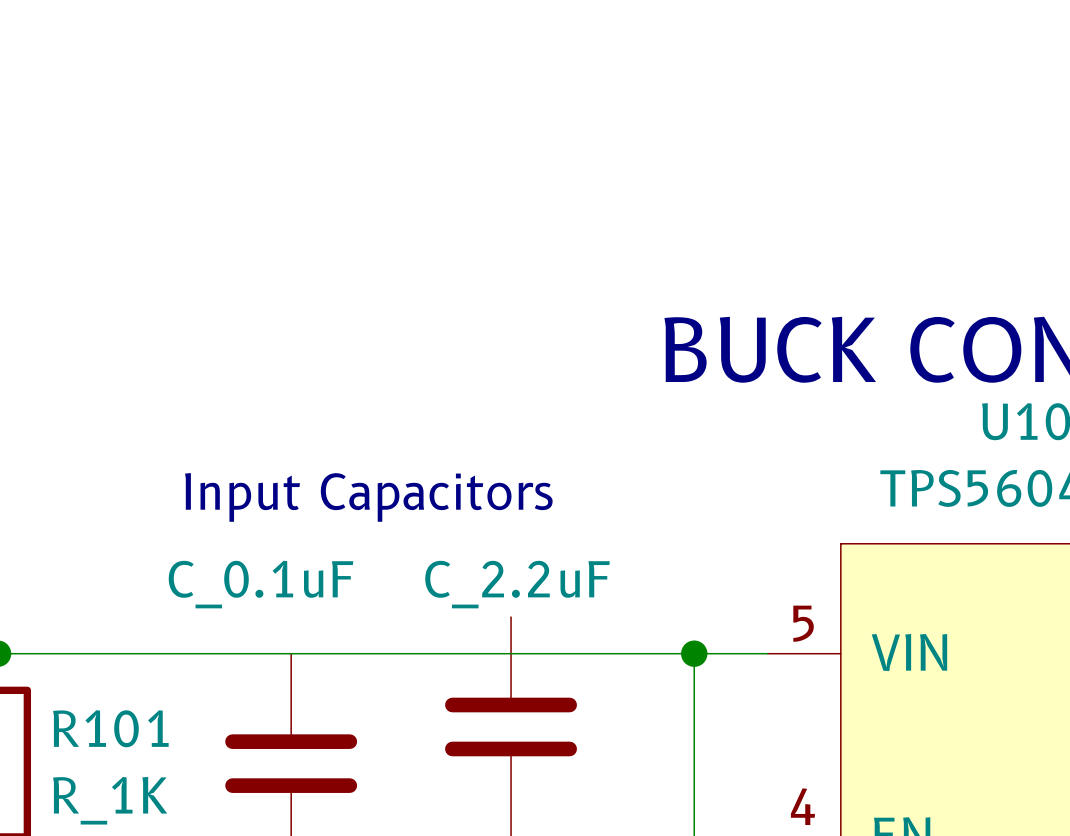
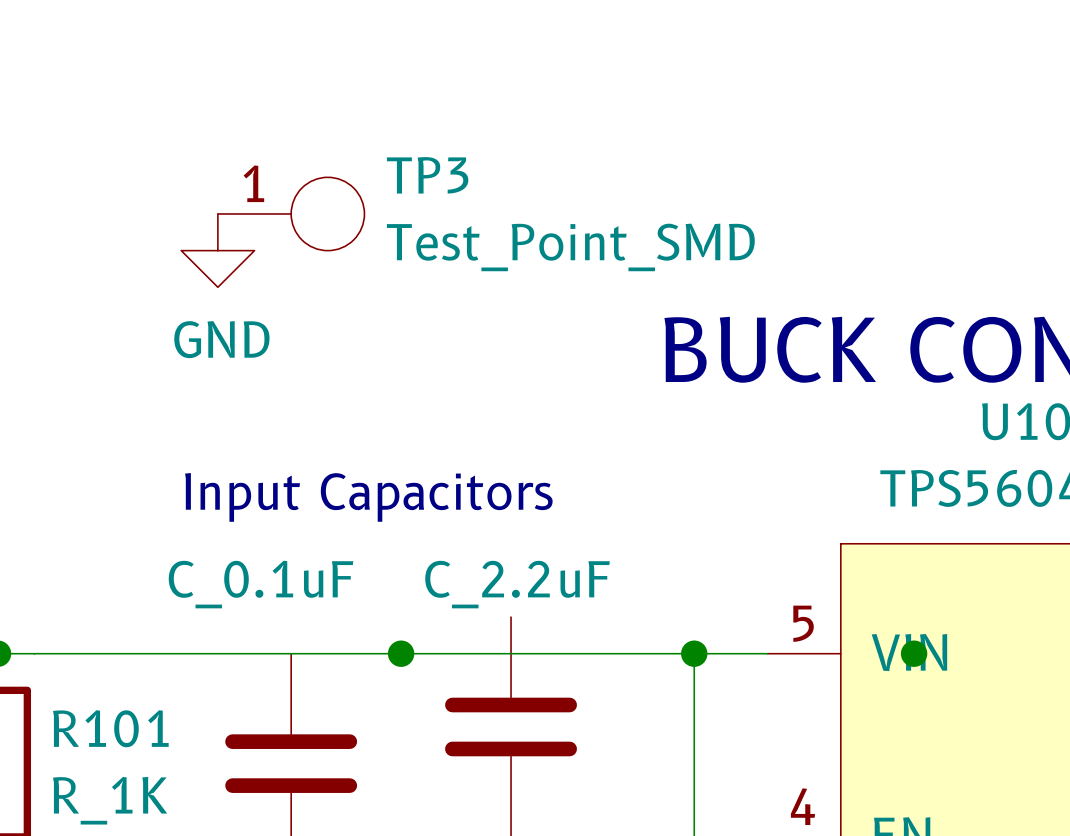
TP3: none -> Test_Point_SMD (291, 213)
power symbol: none -> GND (217, 250)
junction: none -> (401, 653)
junction: none -> (914, 653)

